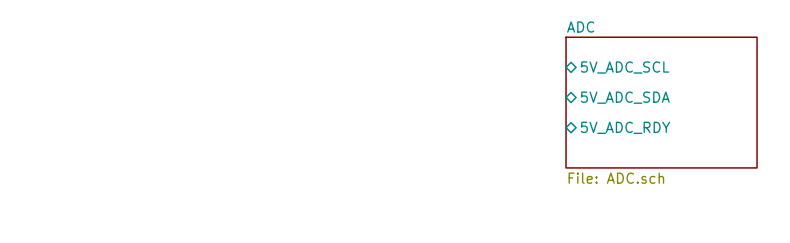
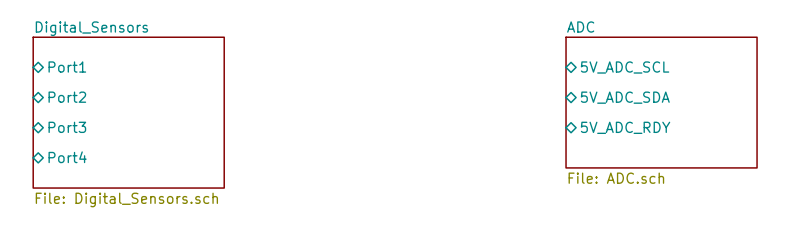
sheet pin: none -> Port1 (67, 67)
sheet pin: none -> Port2 (67, 97)
sheet Digital_Sensors: none -> File: Digital_Sensors.sch (128, 112)
sheet pin: none -> Port3 (67, 127)
sheet pin: none -> Port4 (67, 157)

